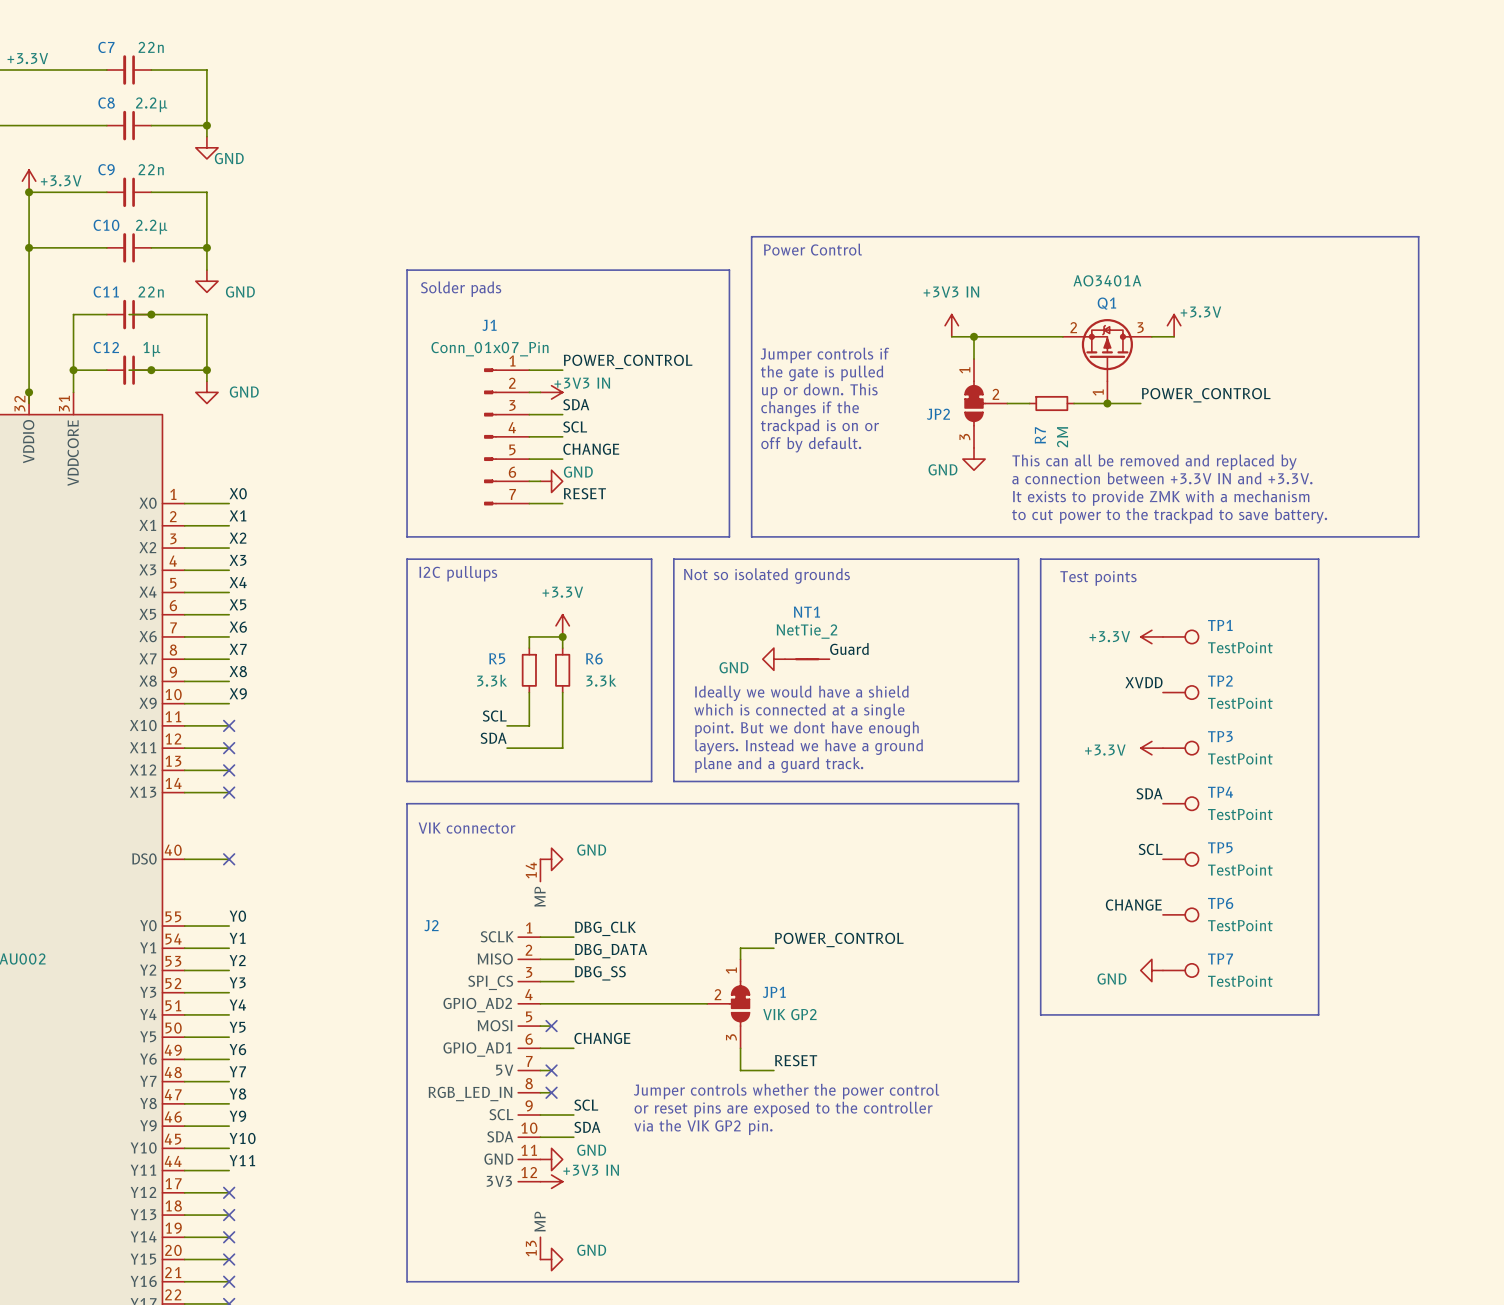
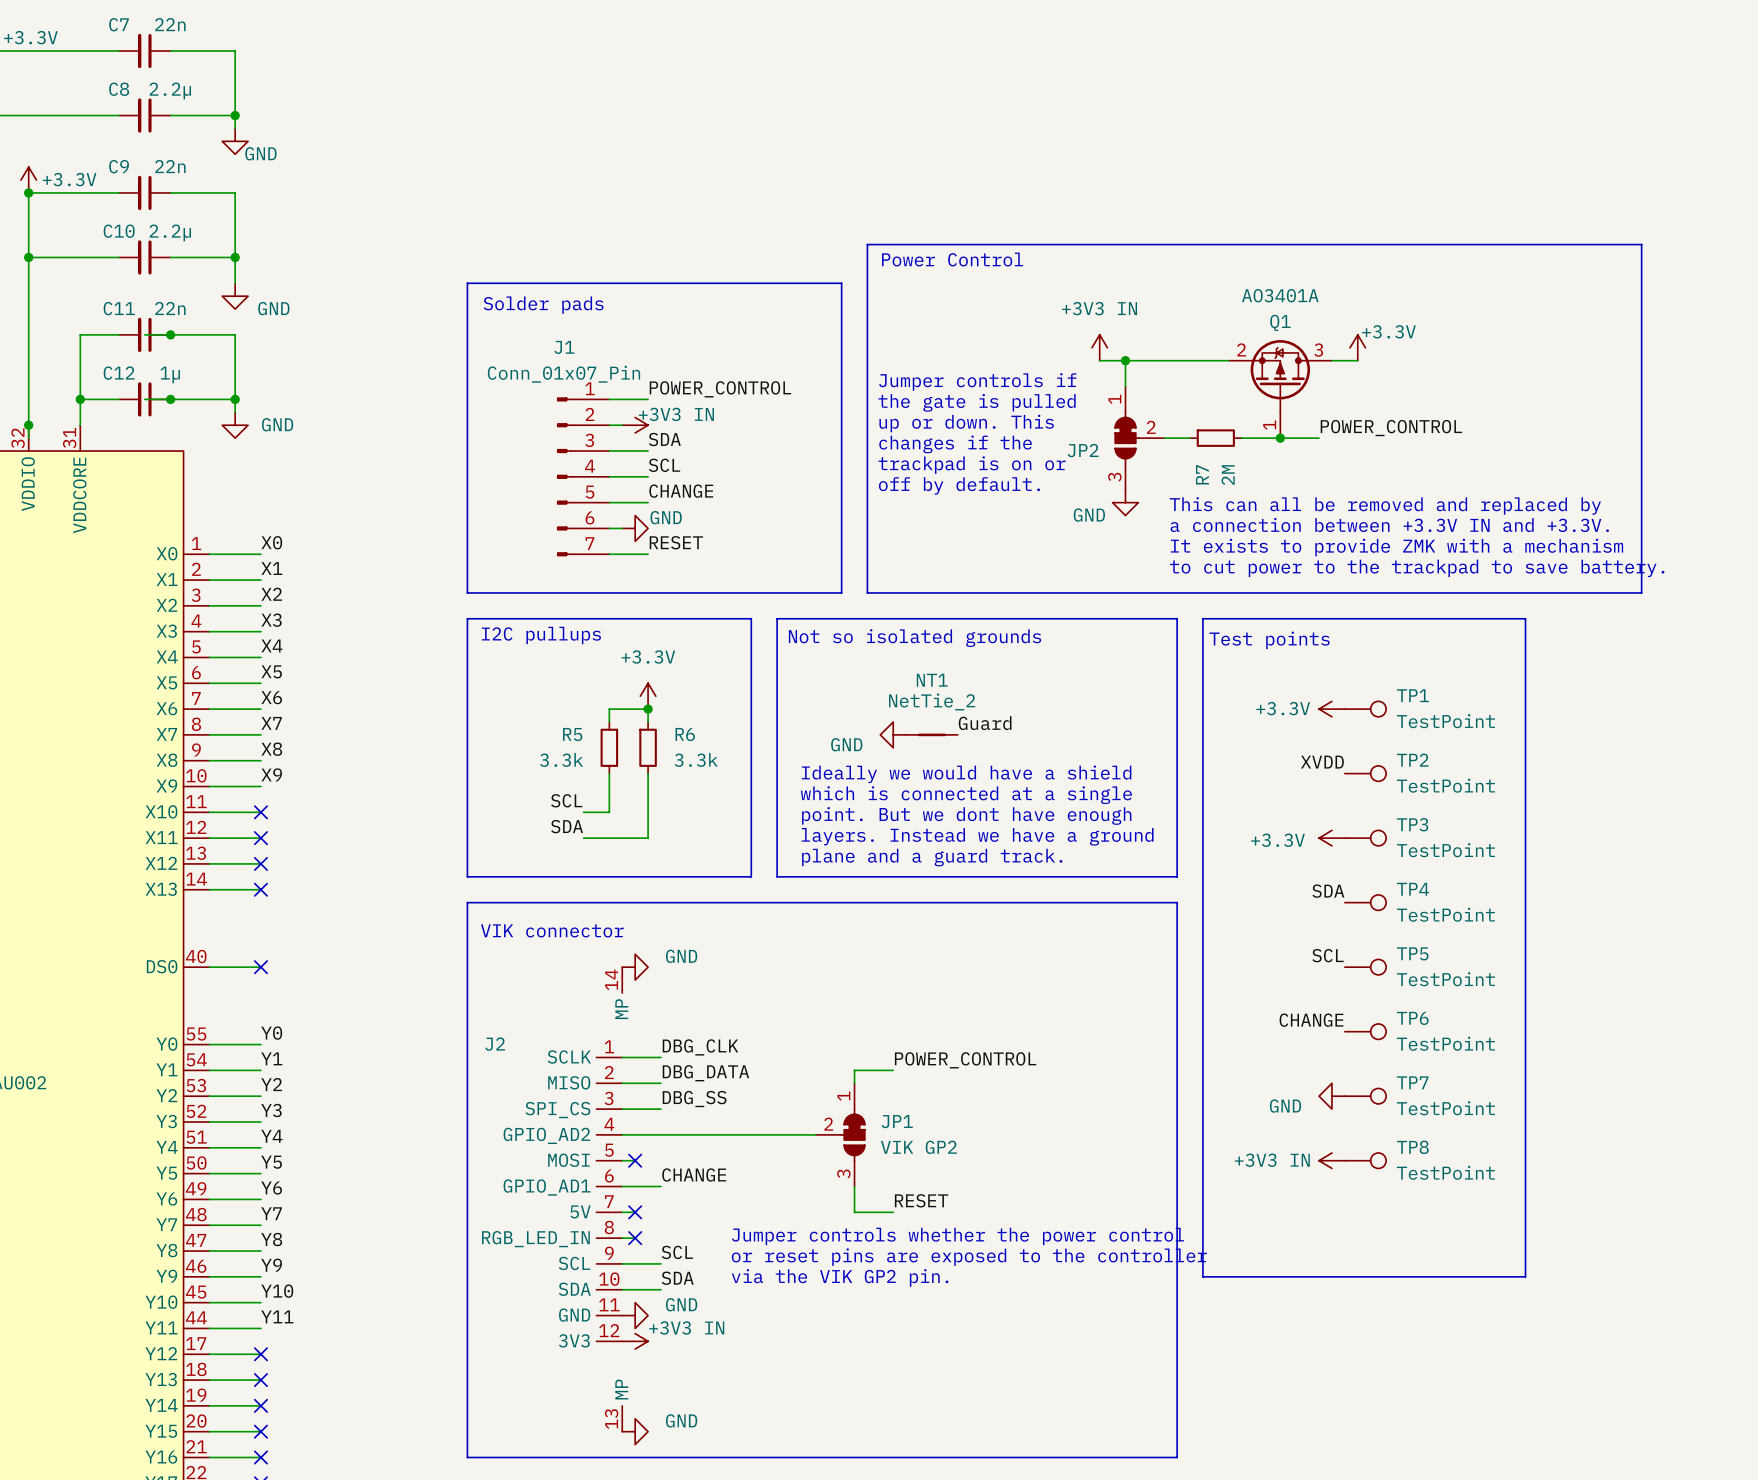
line: (1040, 1014) (1318, 1014) -> (1202, 1147) (1202, 1276) (1525, 1276) (1525, 1147)
power symbol: none -> +3V3 IN (1331, 1160)
TP8: none -> TestPoint (1365, 1160)

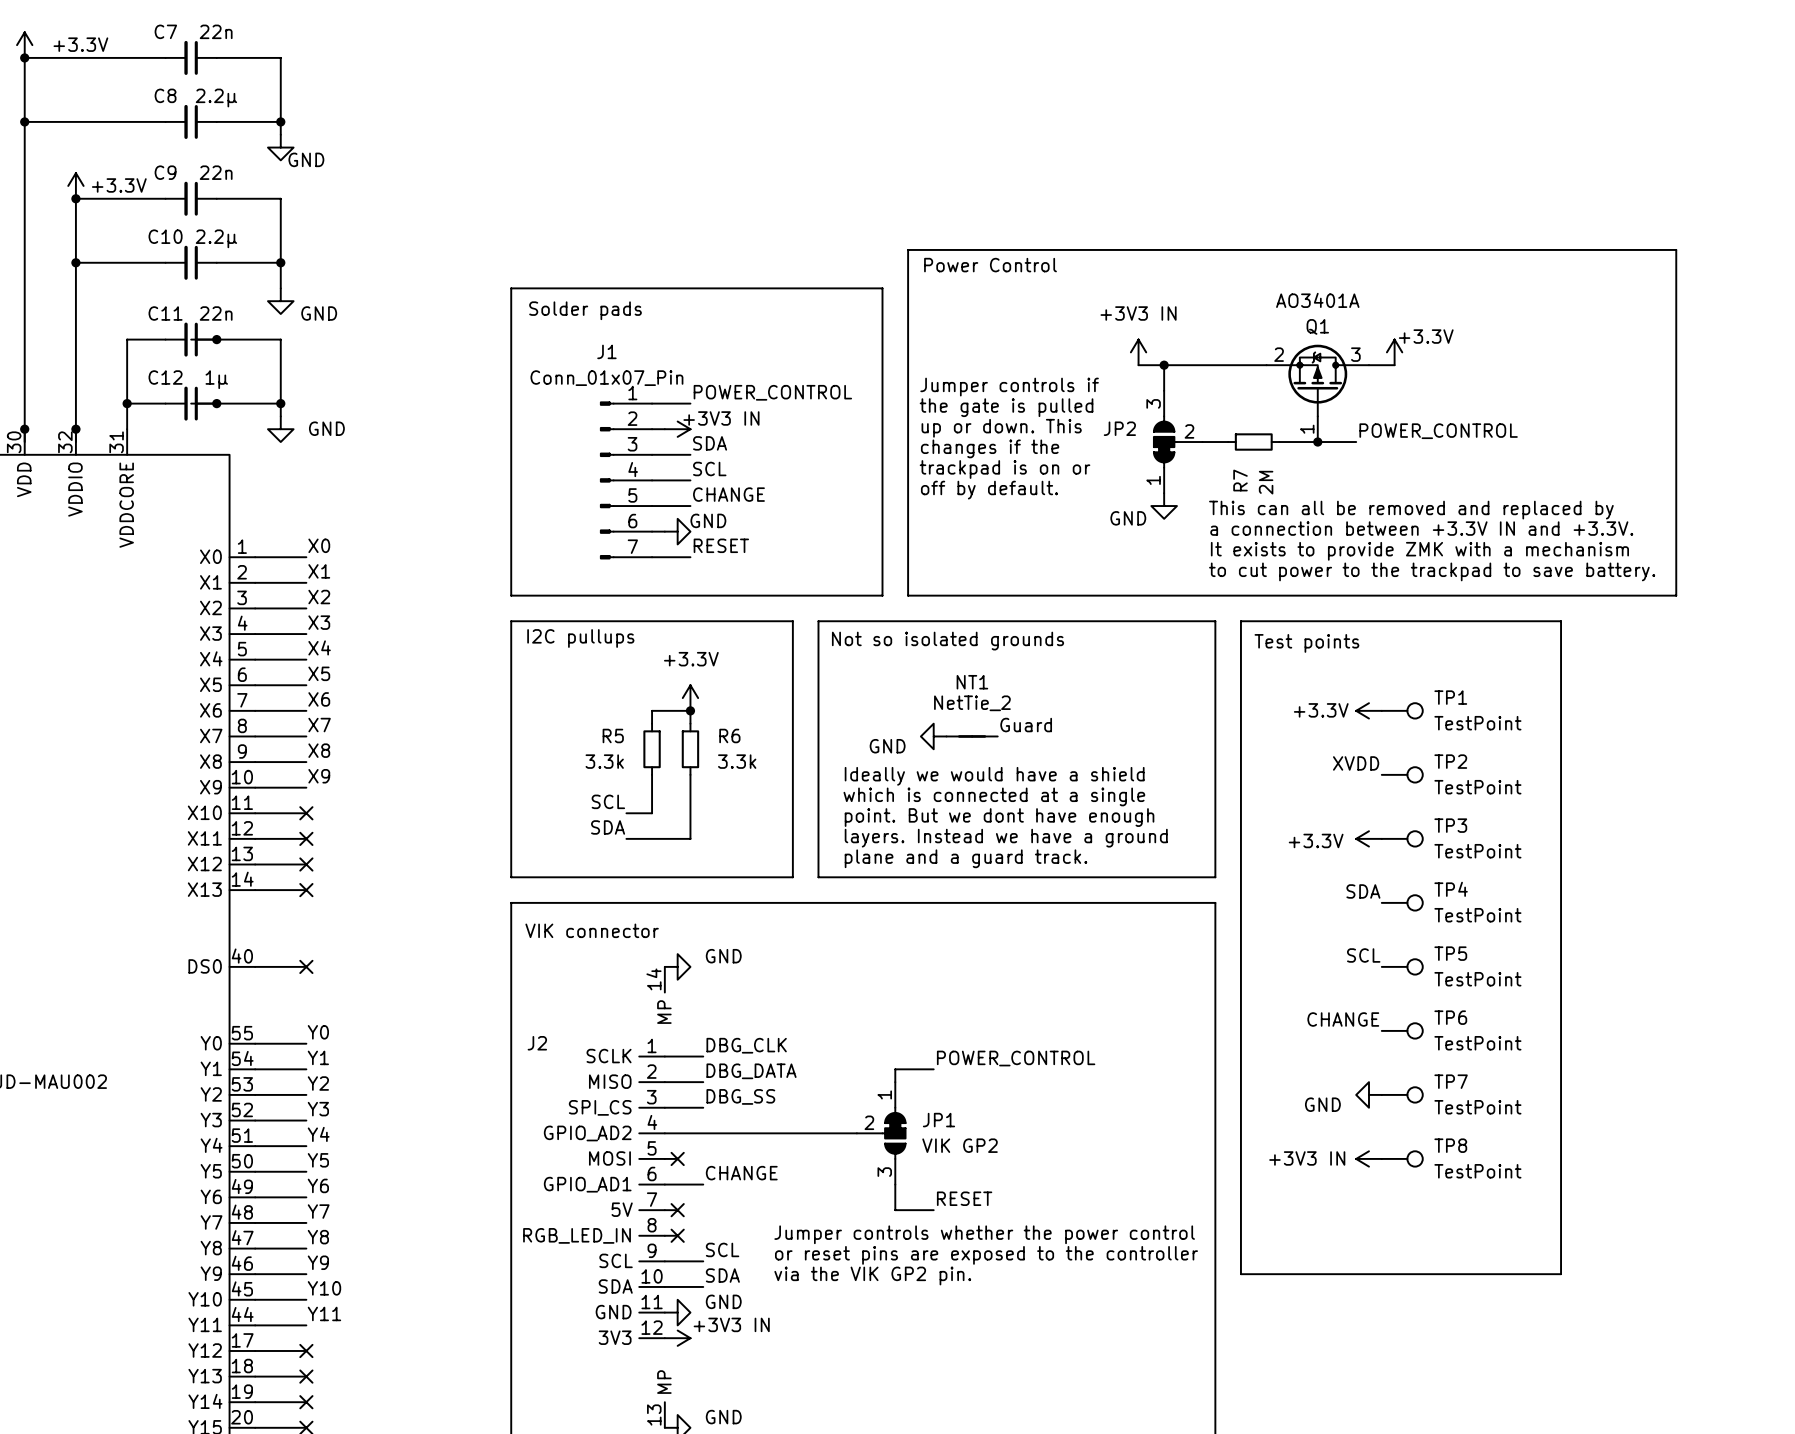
JP2 flip: as is (1126, 438) -> up-down (1165, 442)

